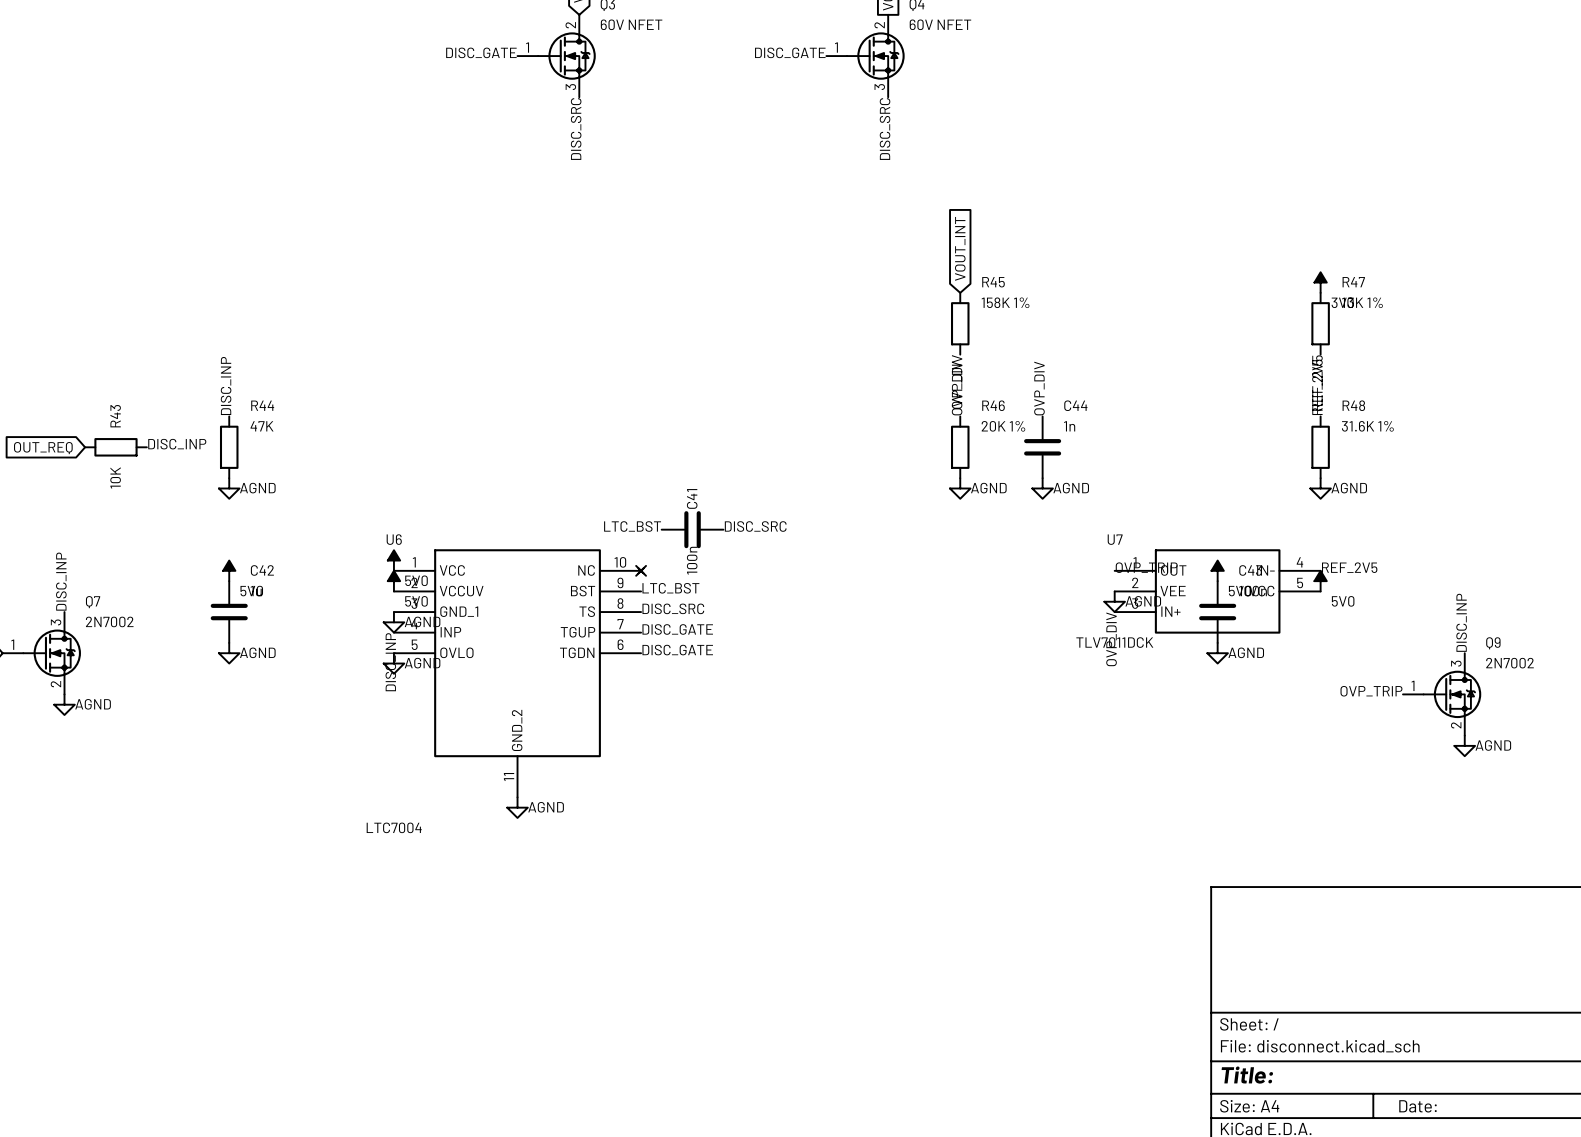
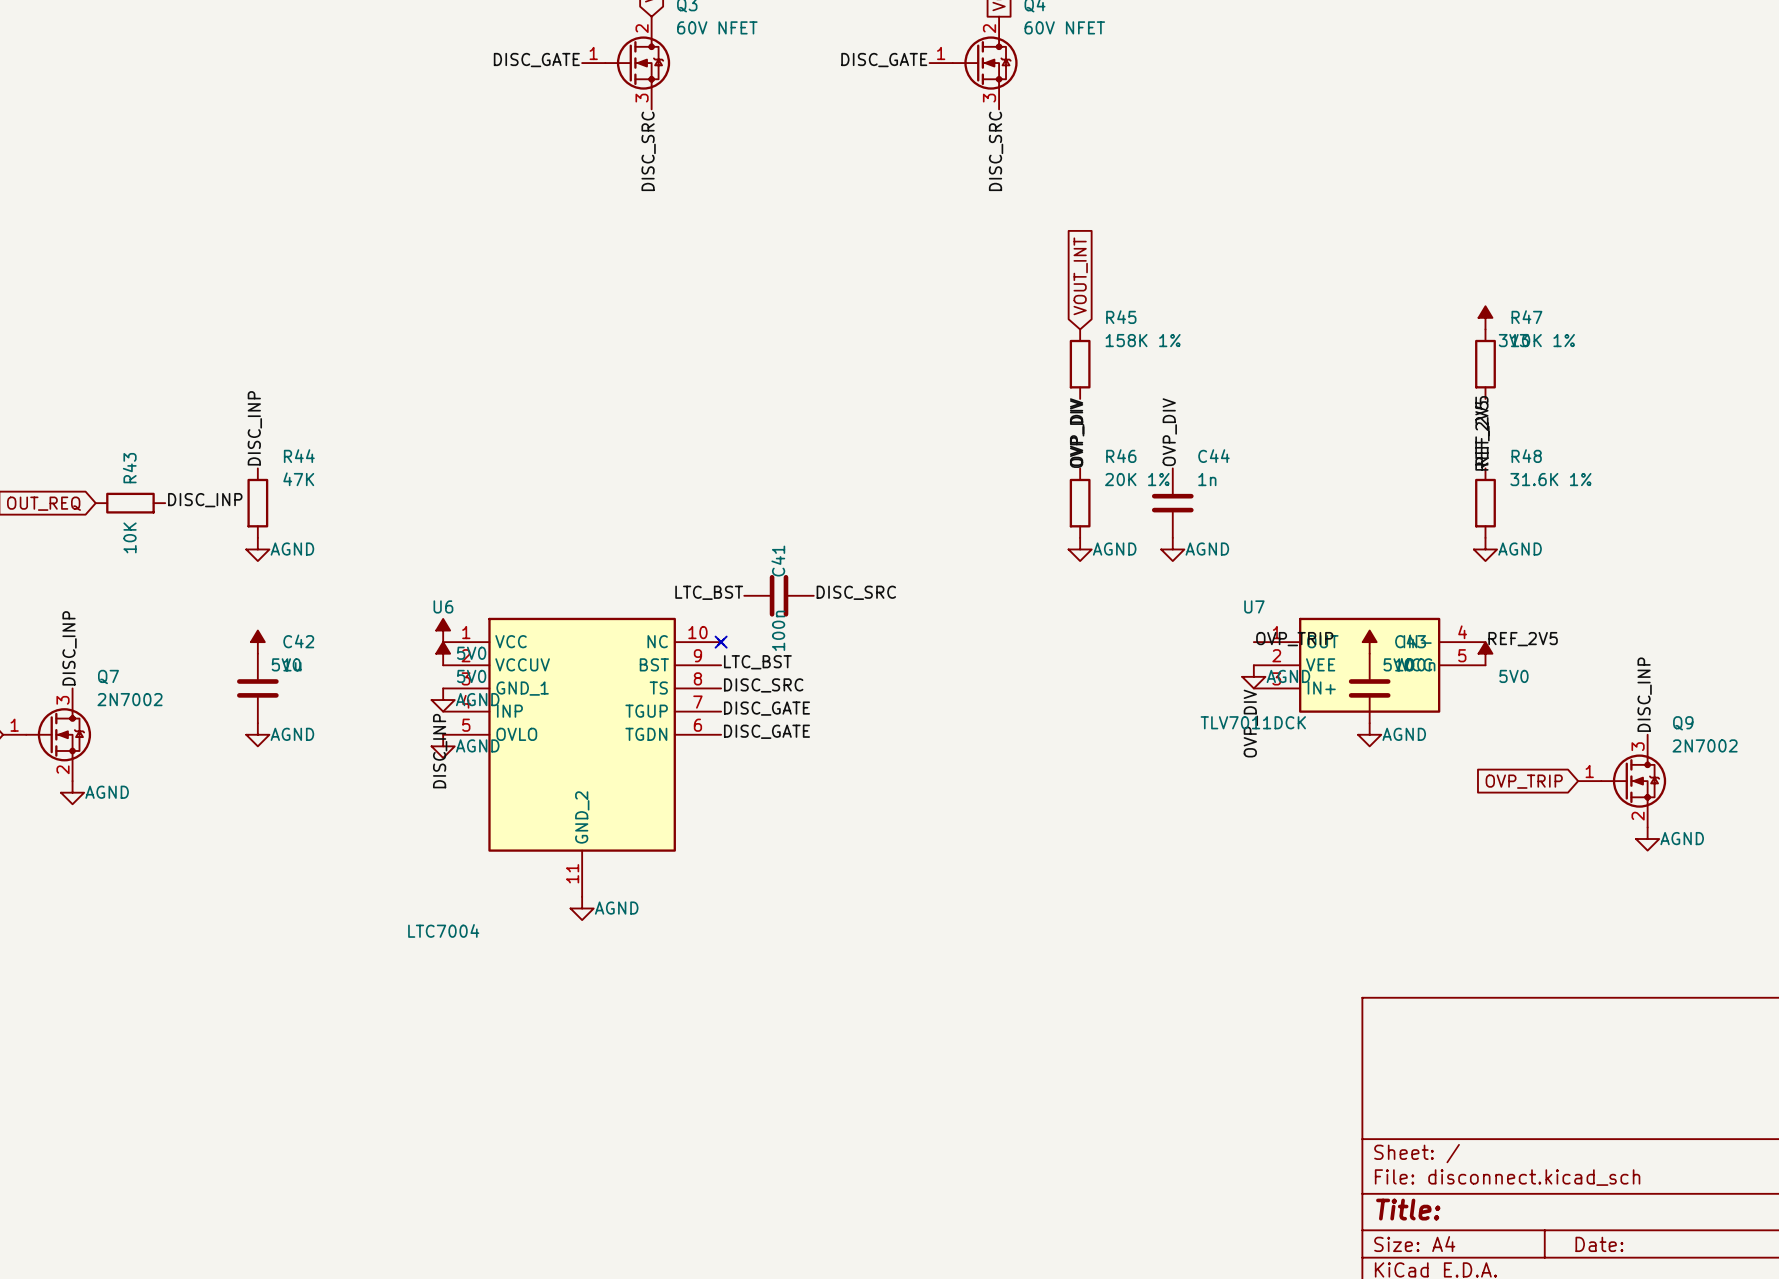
label: OVP_TRIP (1371, 691) -> none
global label: none -> OVP_TRIP (1524, 781)

